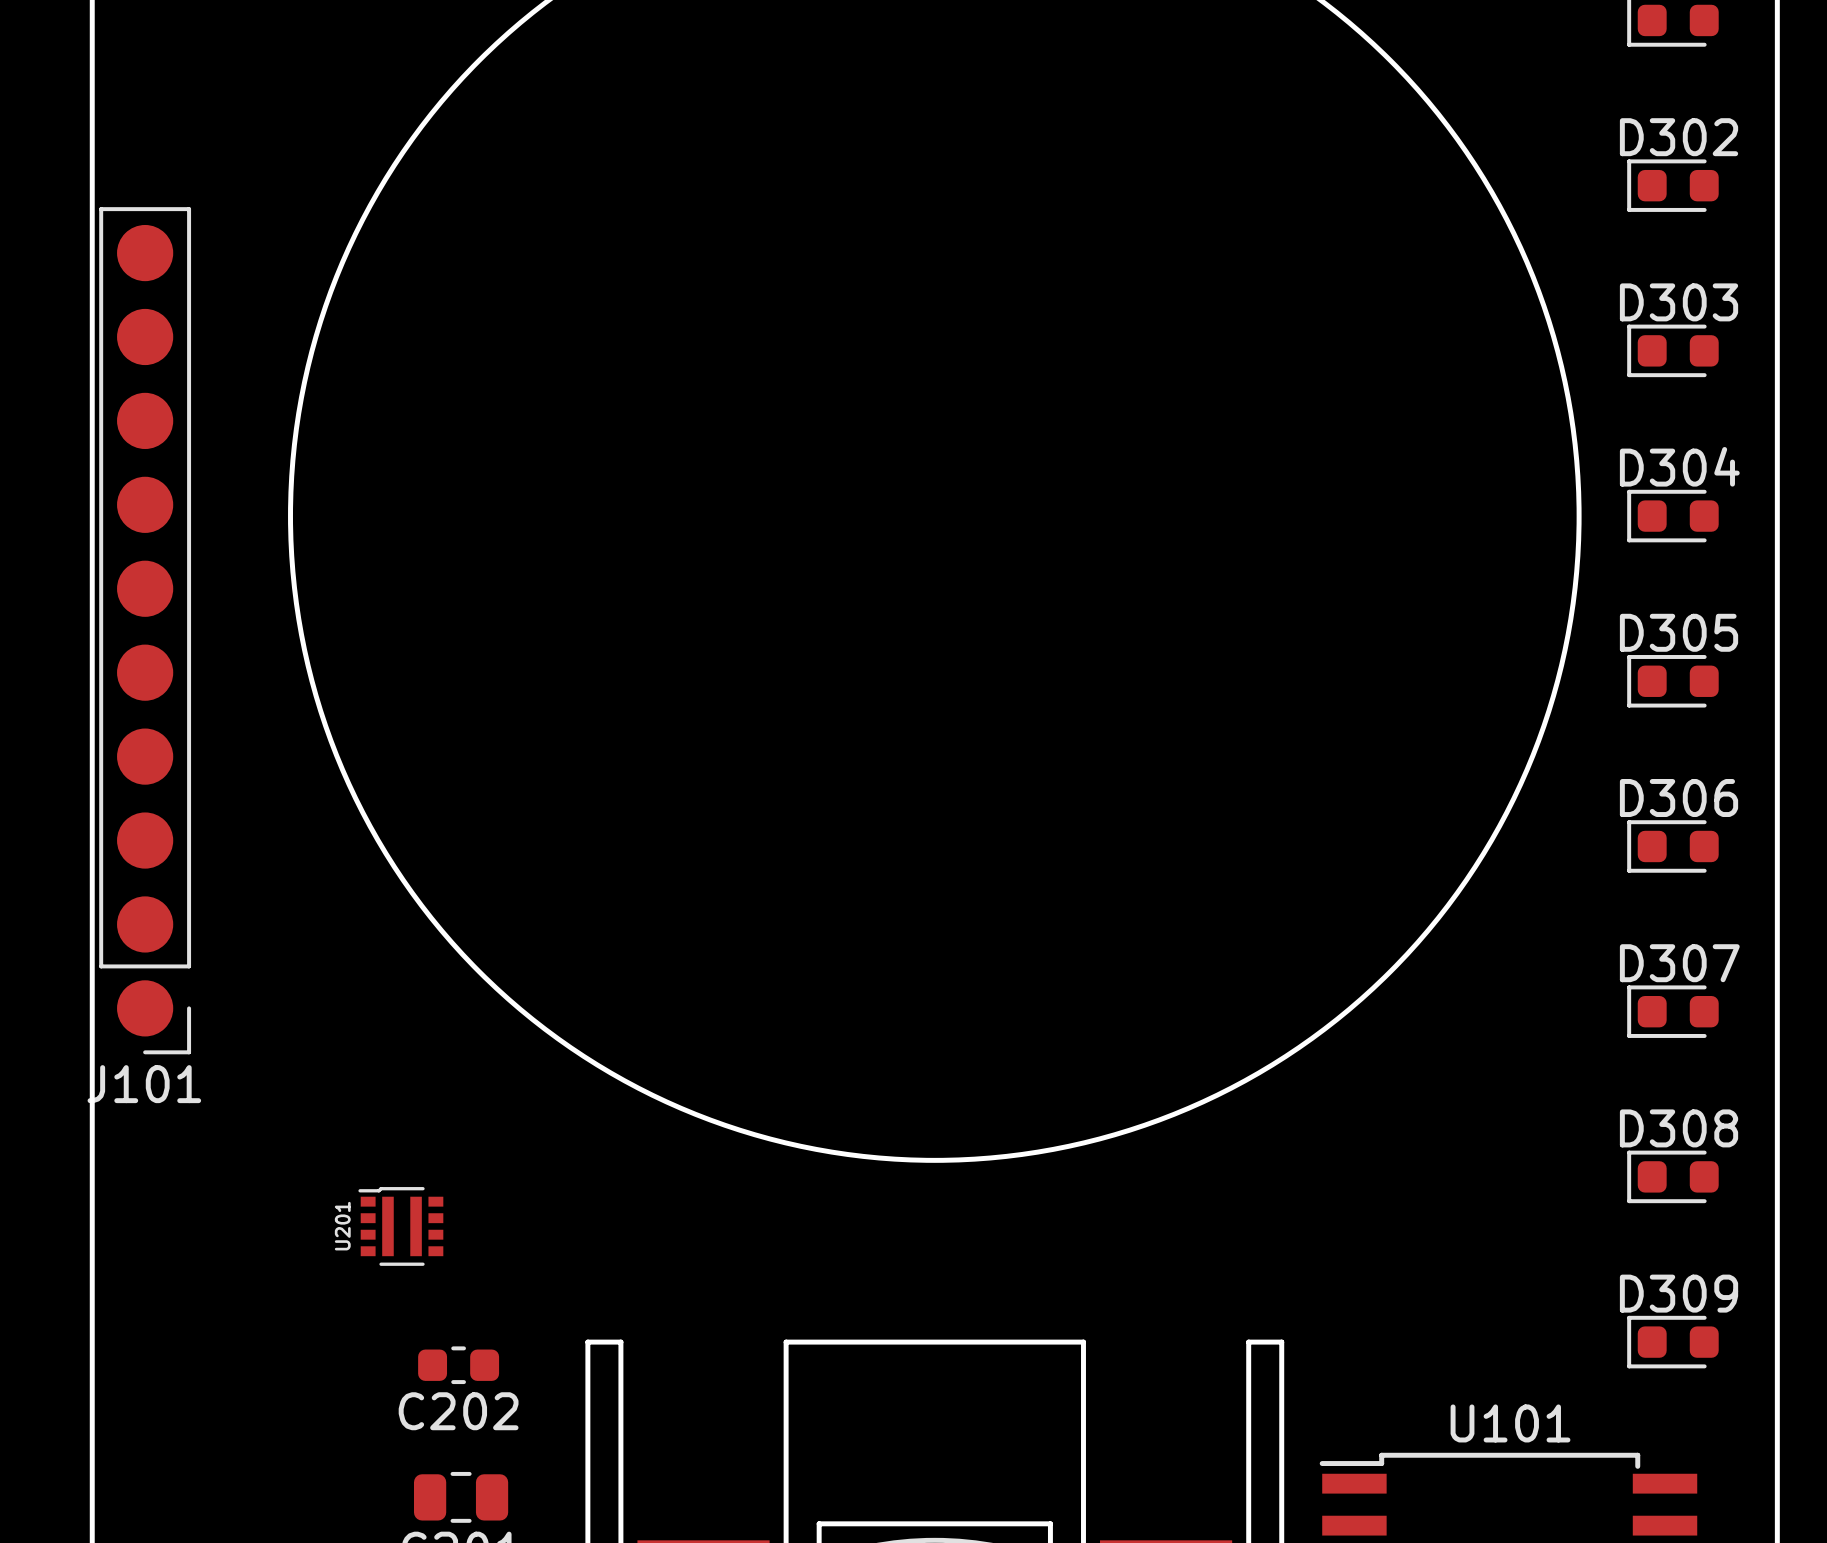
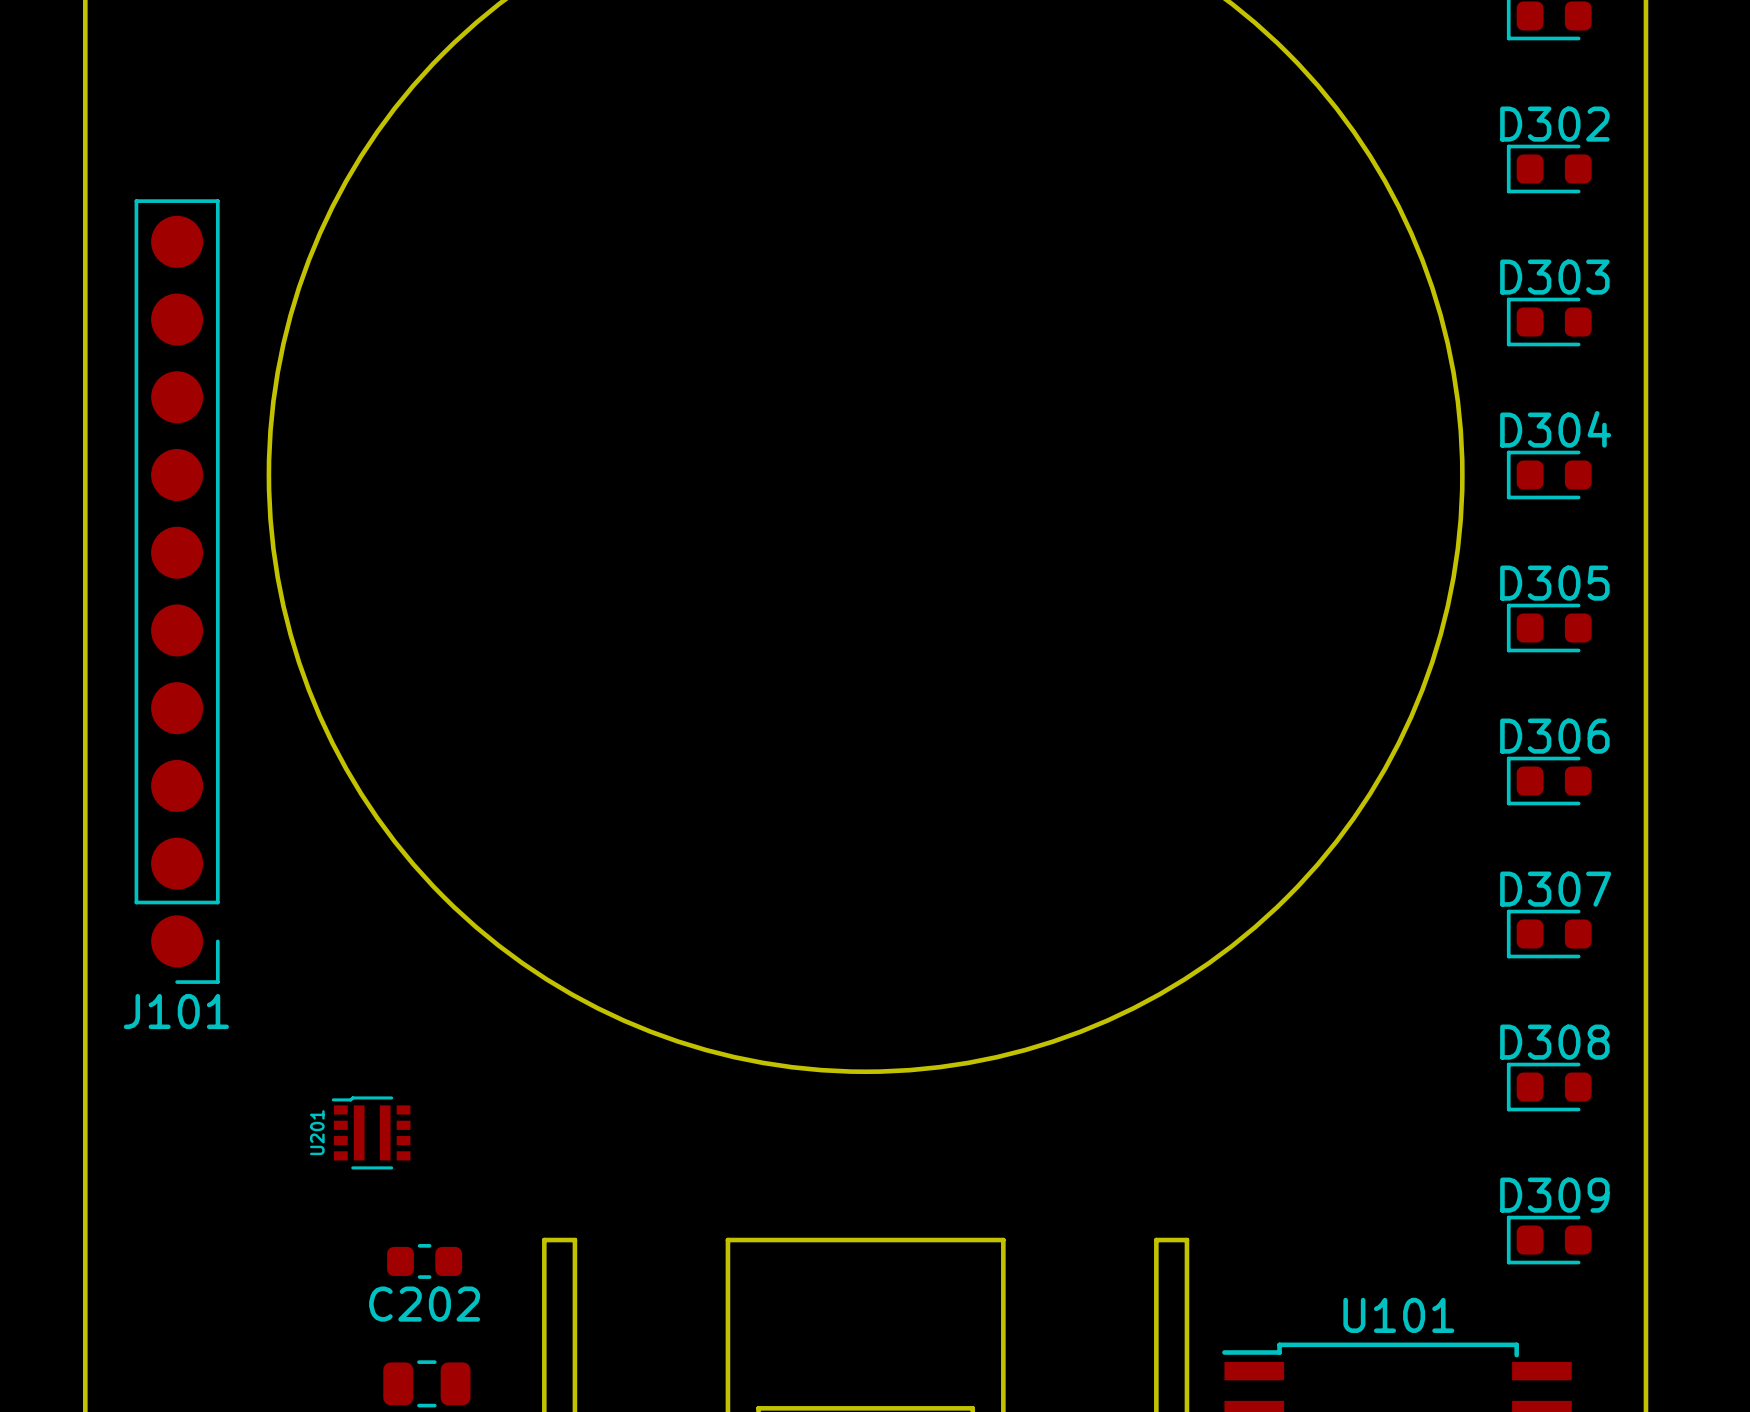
J101 position: (145, 630) -> (177, 591)

